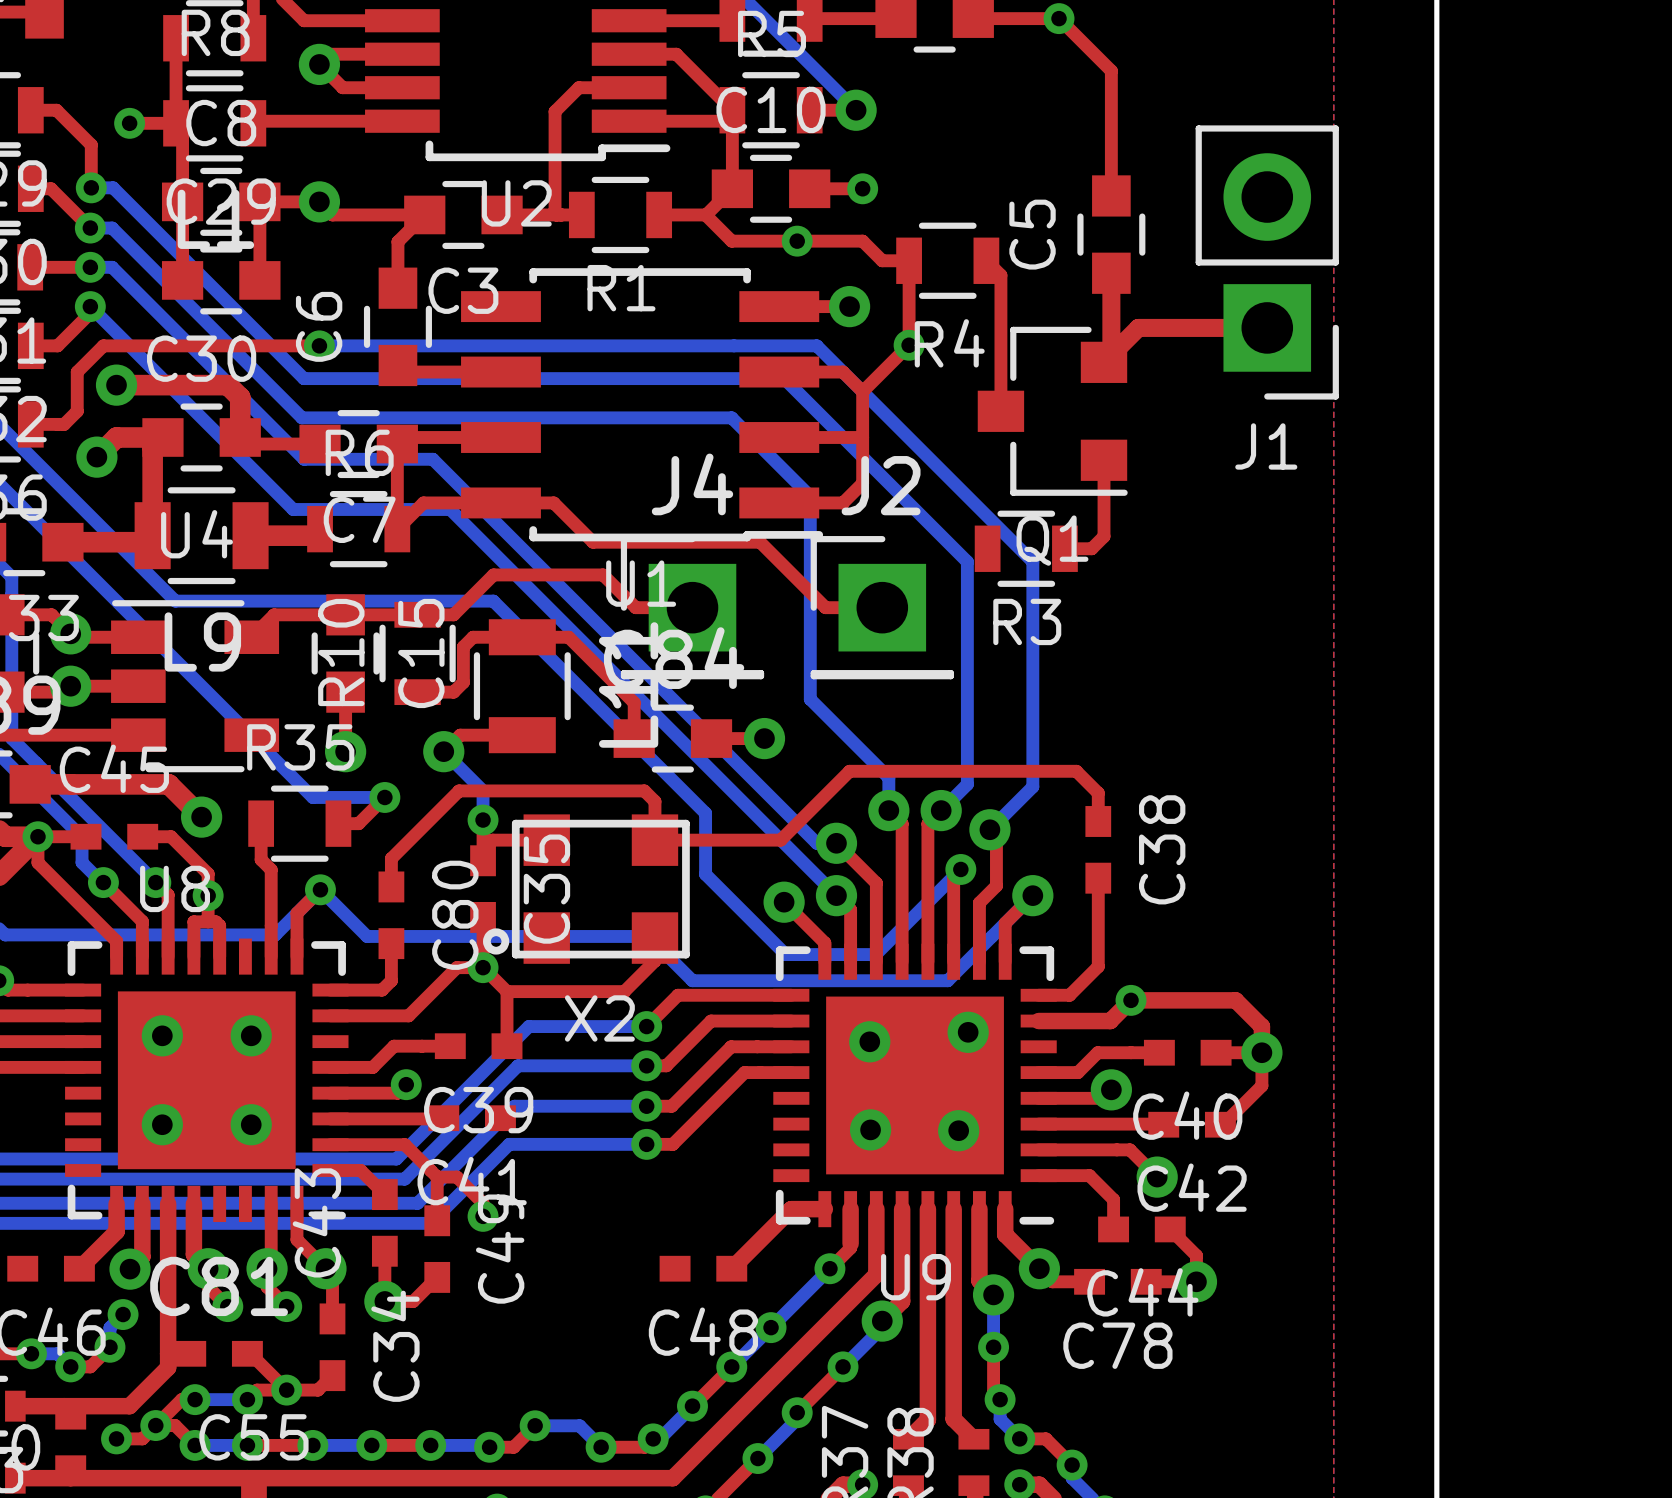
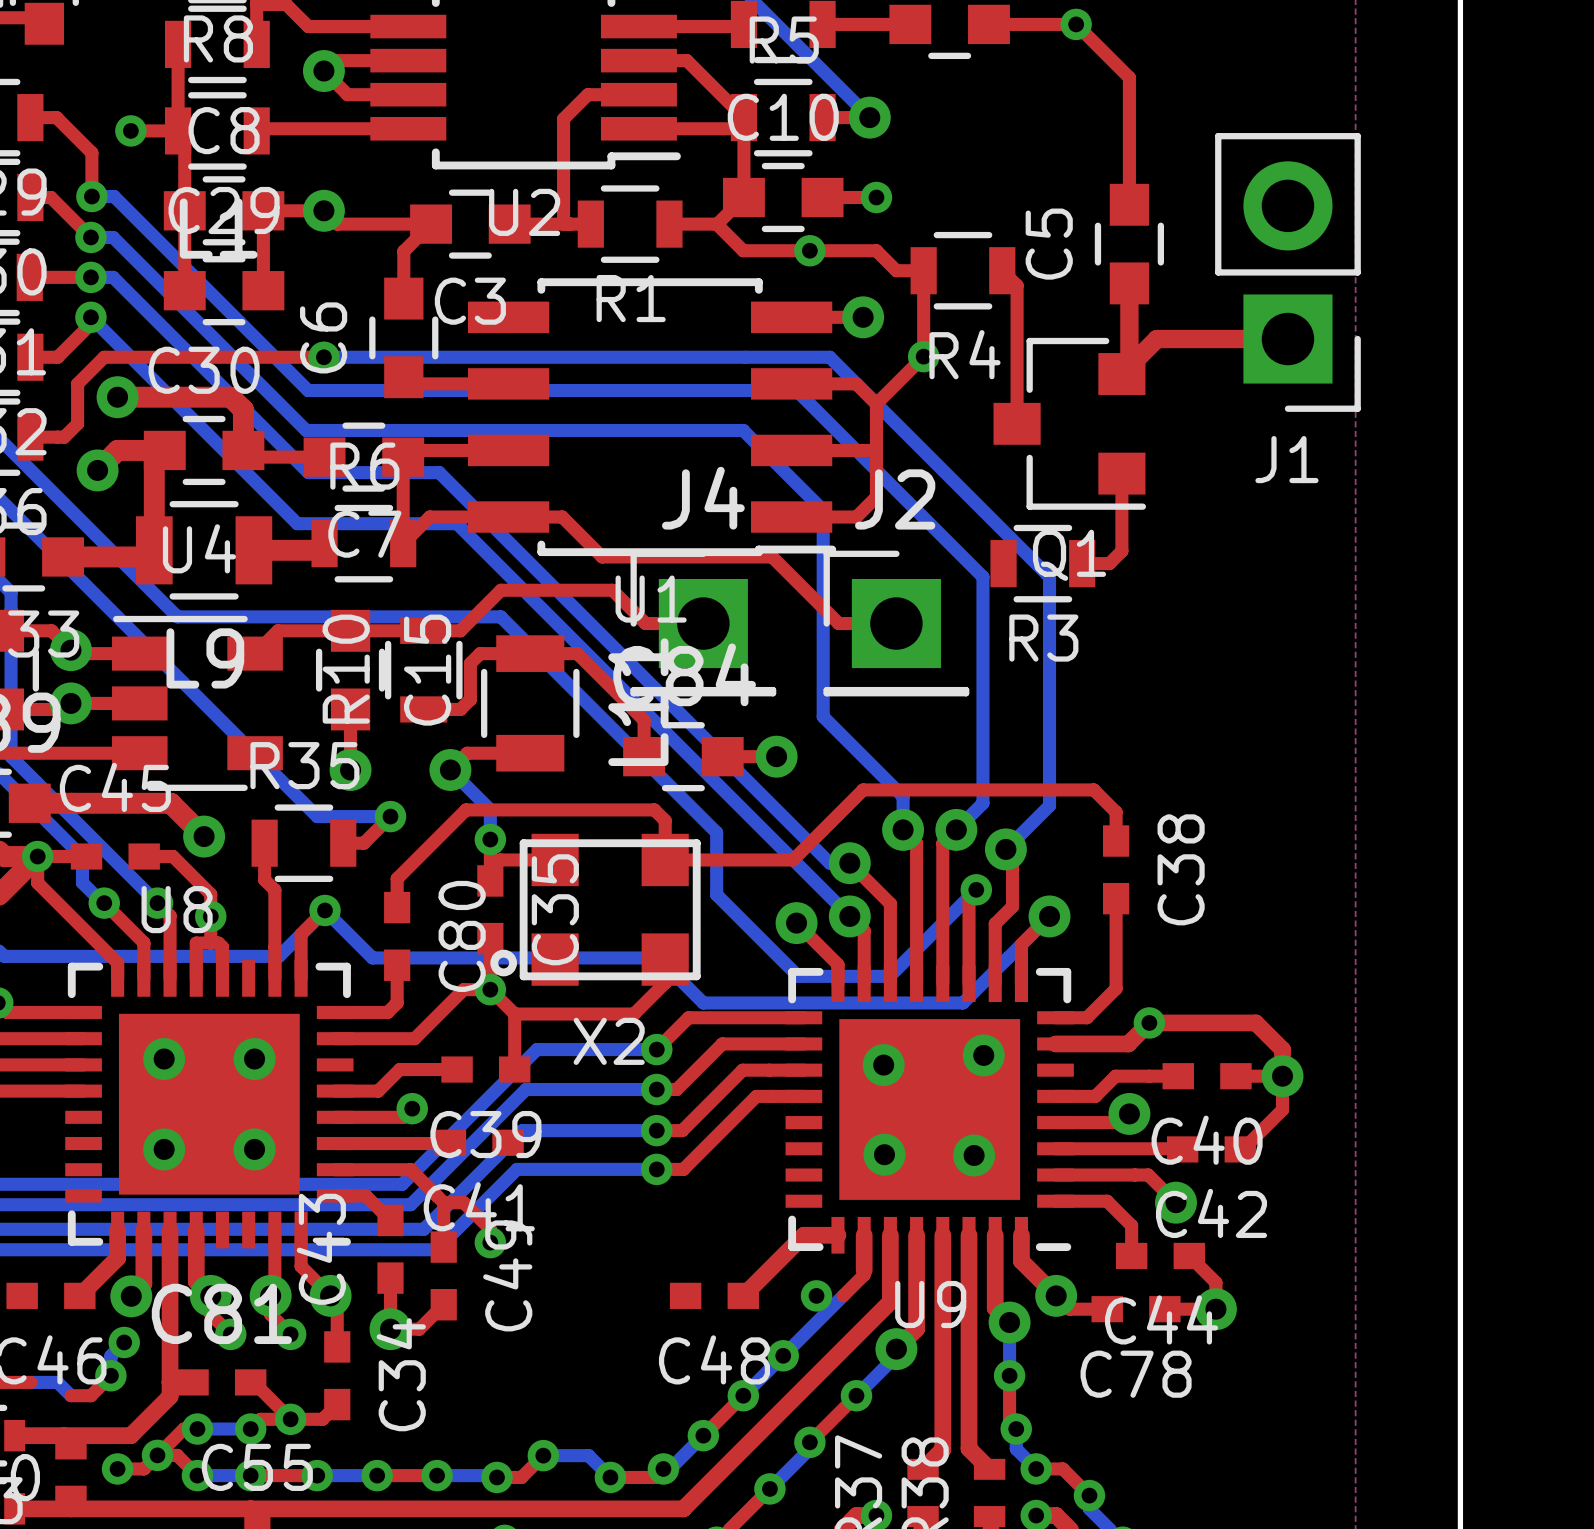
via position: (829, 1268) -> (816, 1295)
via: (31, 1353) -> none
via: (70, 1366) -> none

